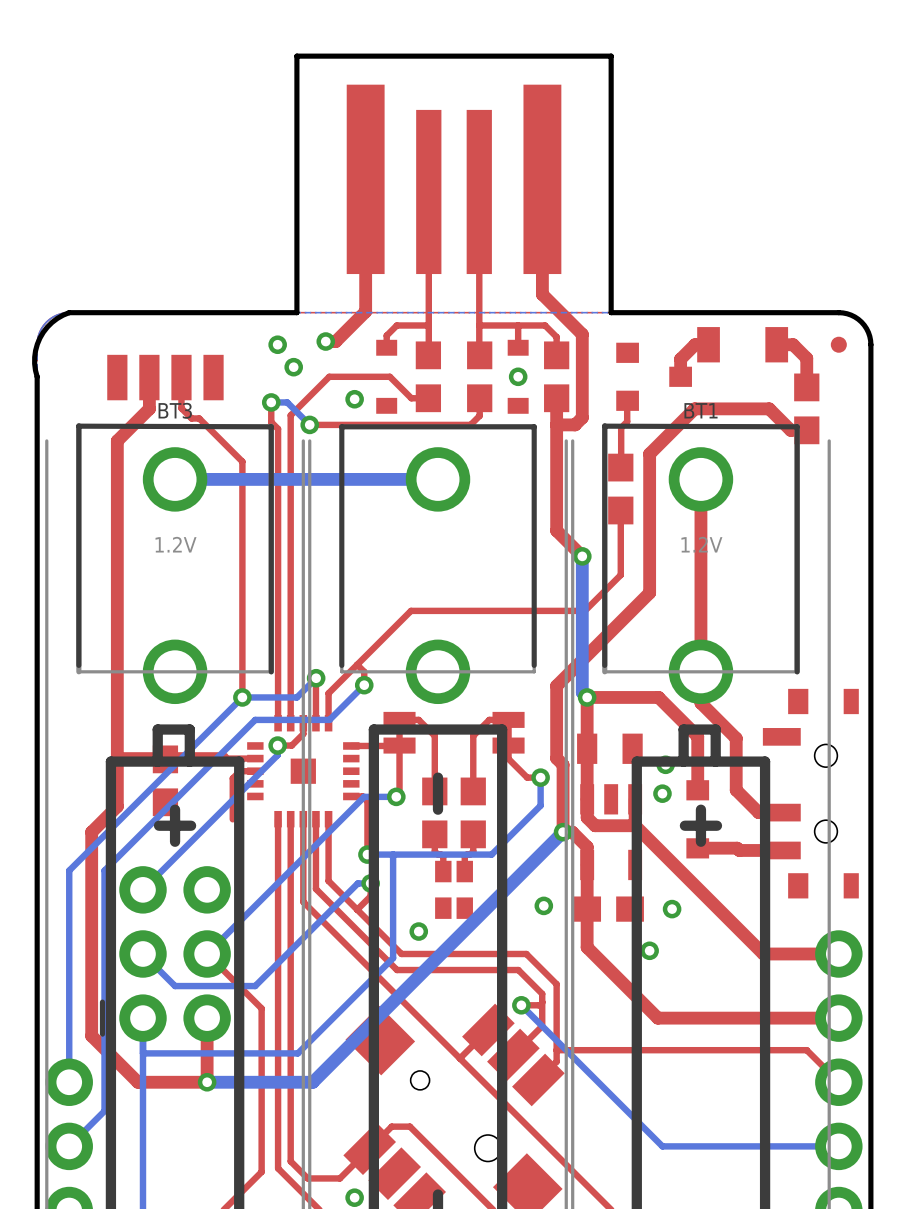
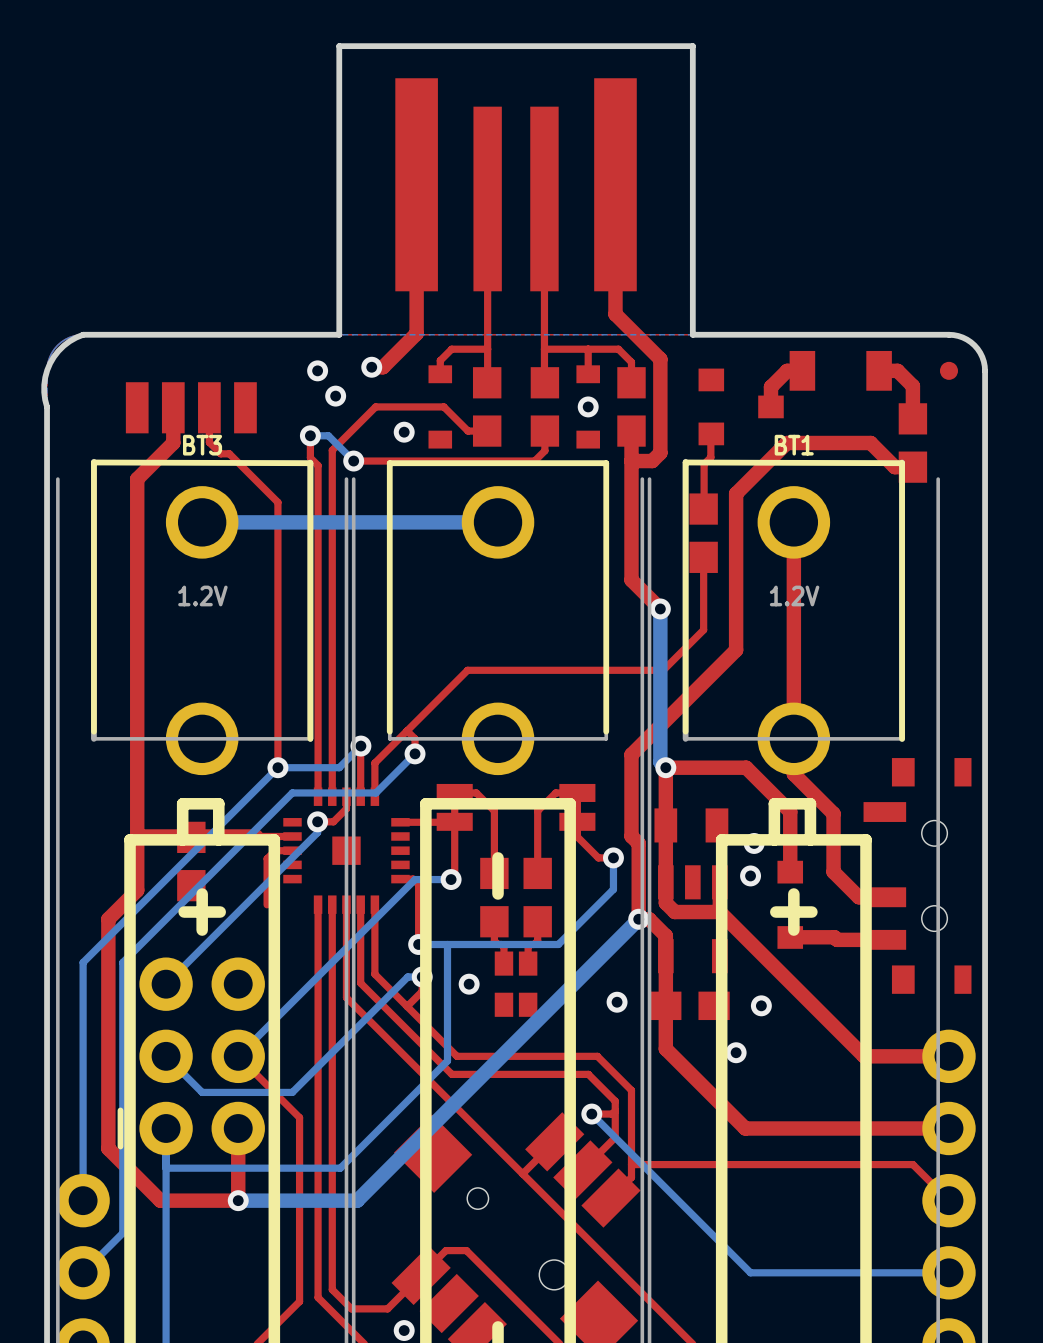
via position: (418, 931) -> (469, 984)

